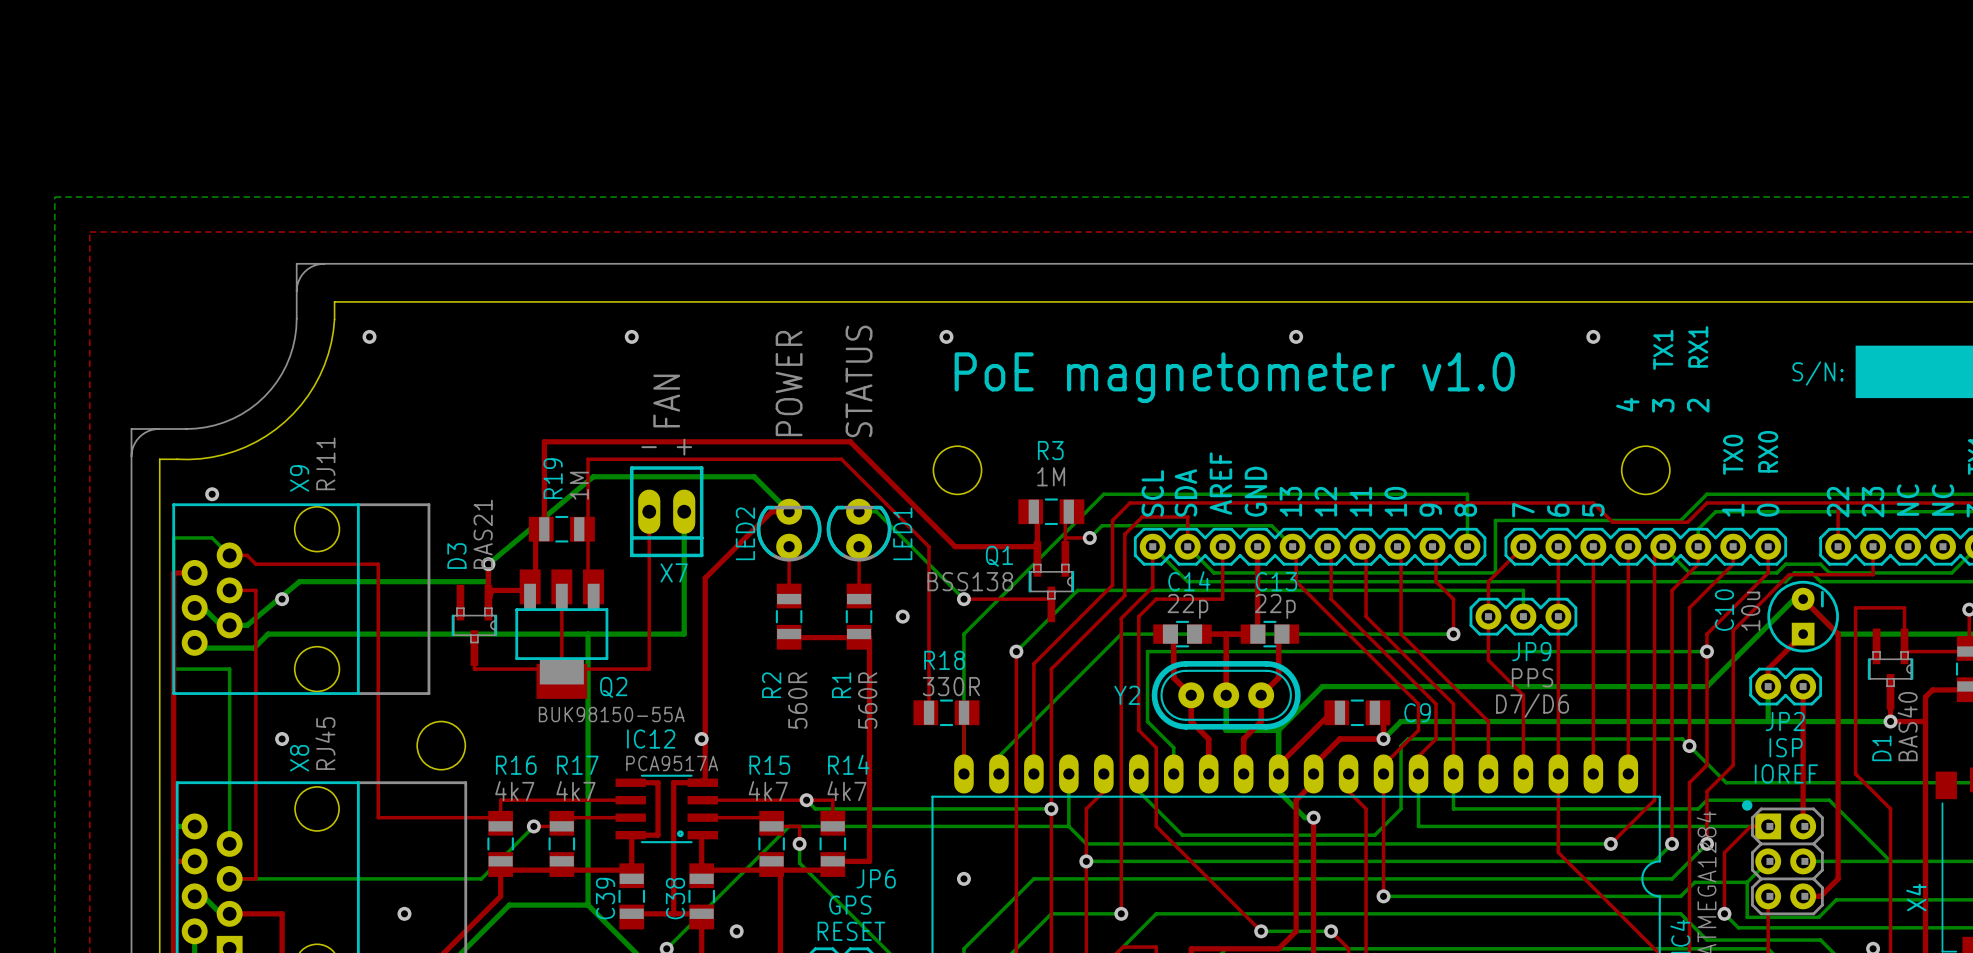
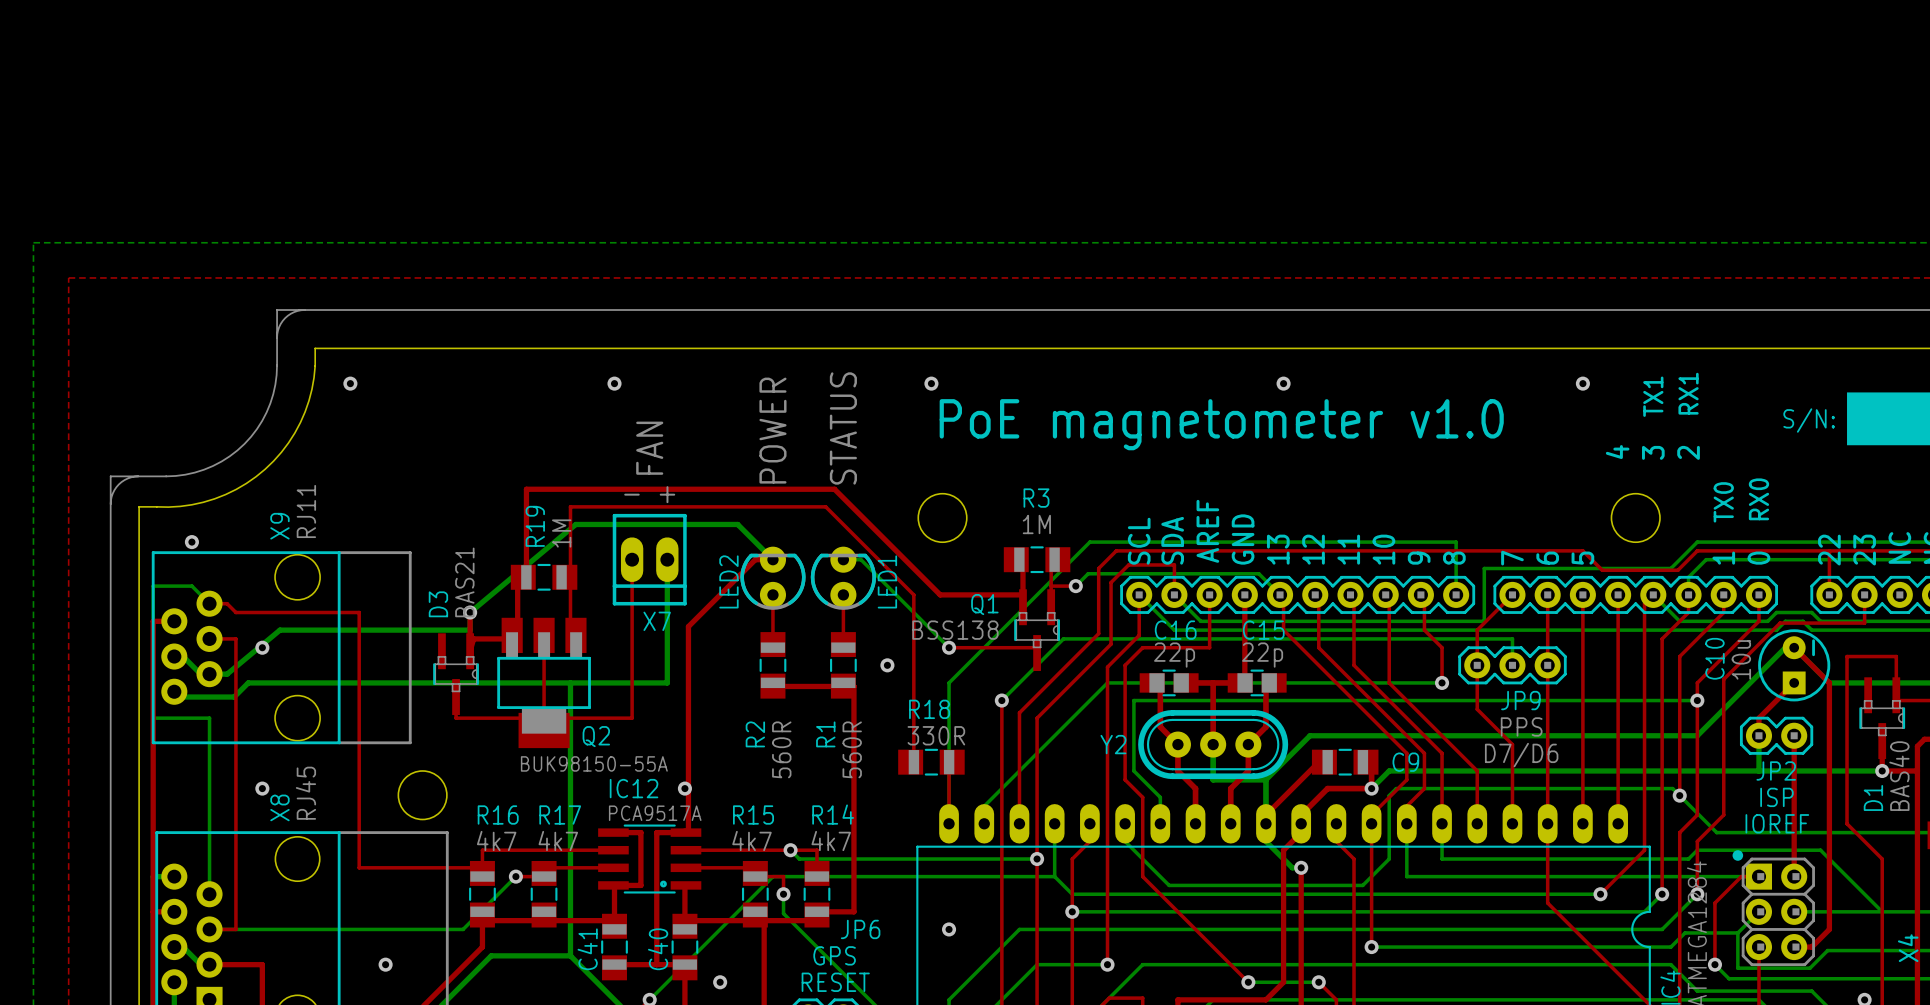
C14 name: C14 (1189, 581) -> C16 (1175, 630)
C13 name: C13 (1276, 581) -> C15 (1263, 630)
C39 name: C39 (605, 898) -> C41 (587, 949)
C38 name: C38 (675, 898) -> C40 (658, 949)

